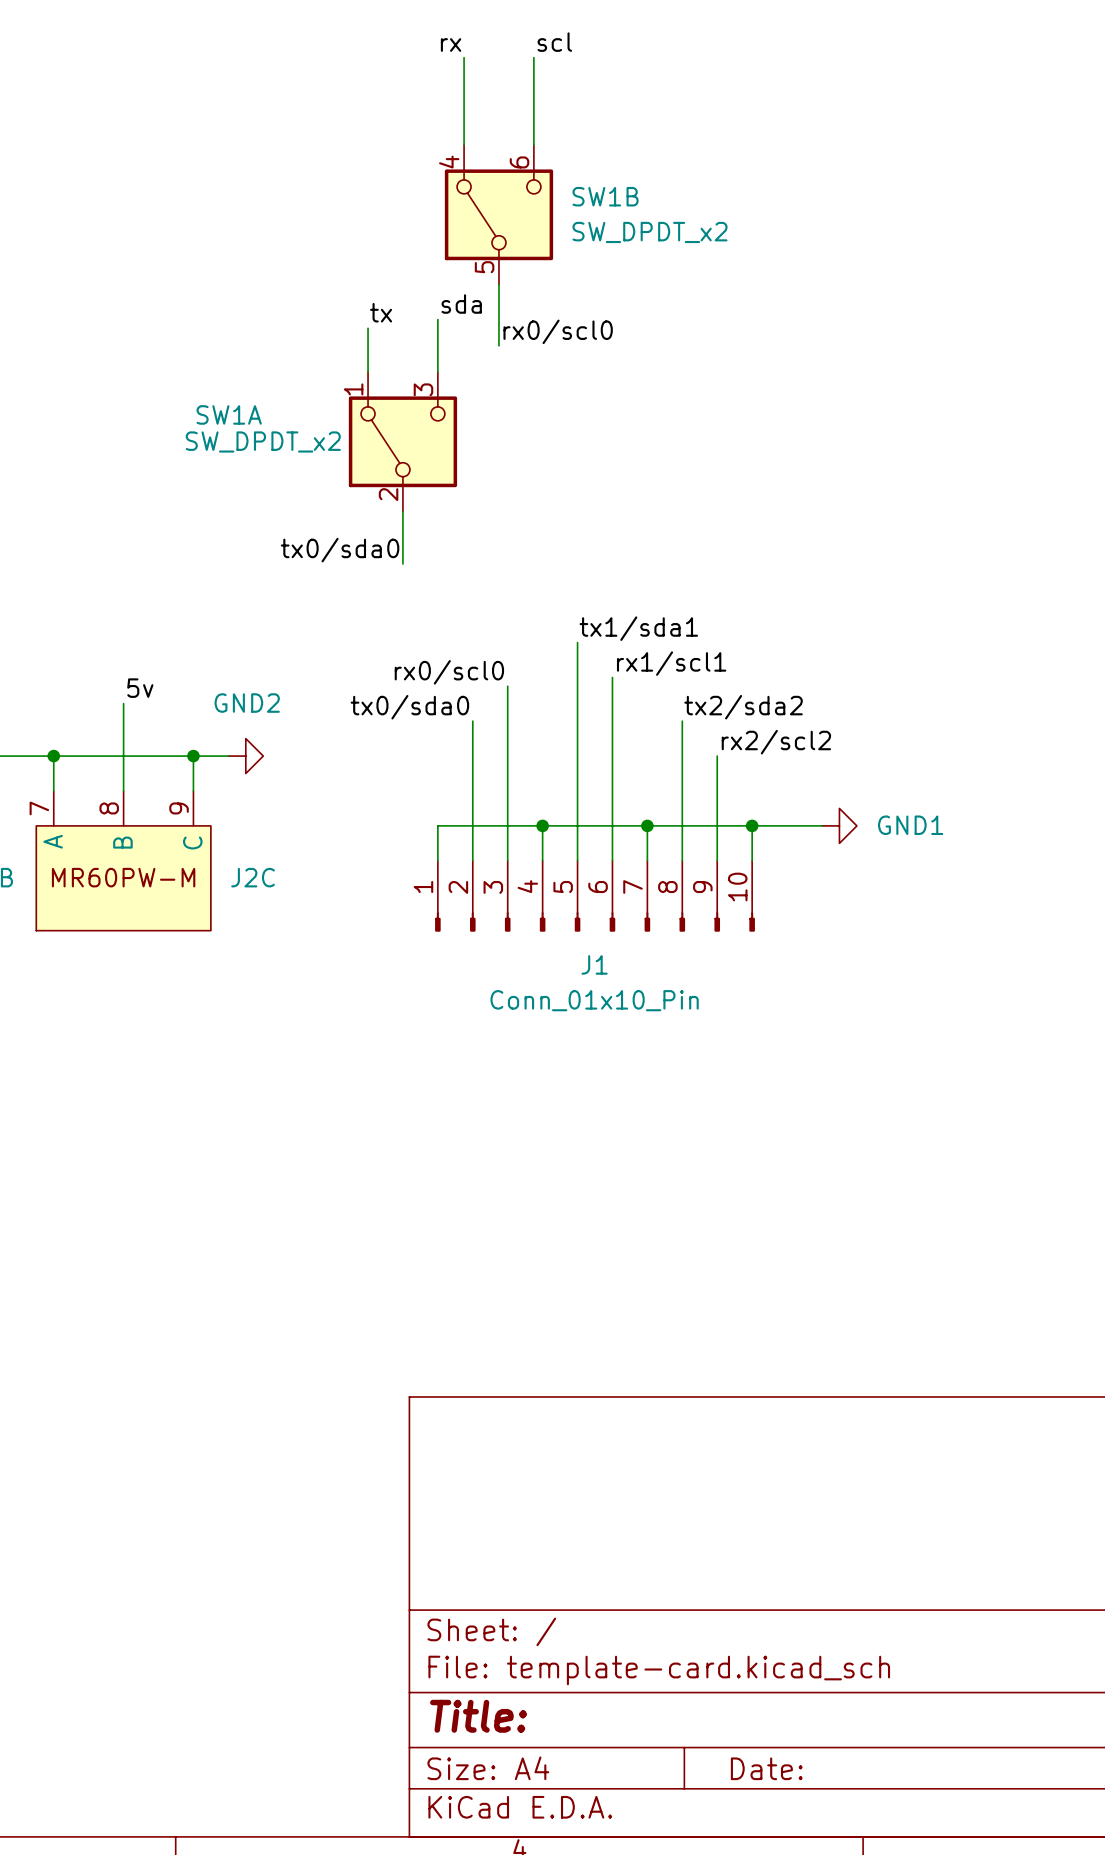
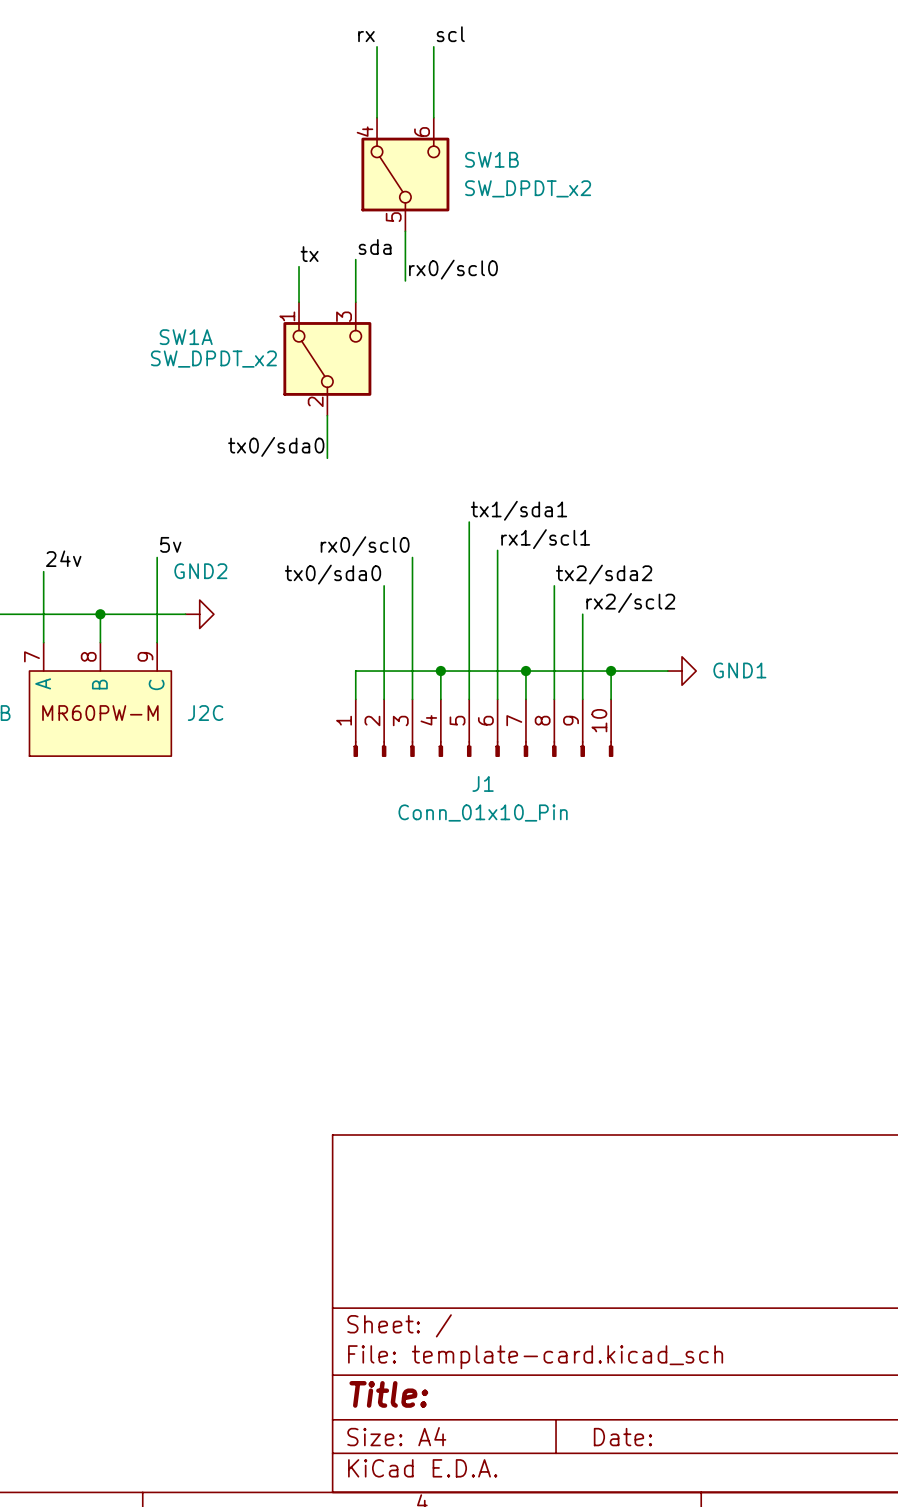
wire: none -> (157, 557) (157, 614)
label: none -> 24v (63, 558)
label position: 5v (140, 688) -> 5v (170, 544)
wire: (123, 703) (123, 756) -> (43, 571) (43, 614)
junction: (53, 756) -> none
junction: none -> (100, 614)
junction: (193, 756) -> none

